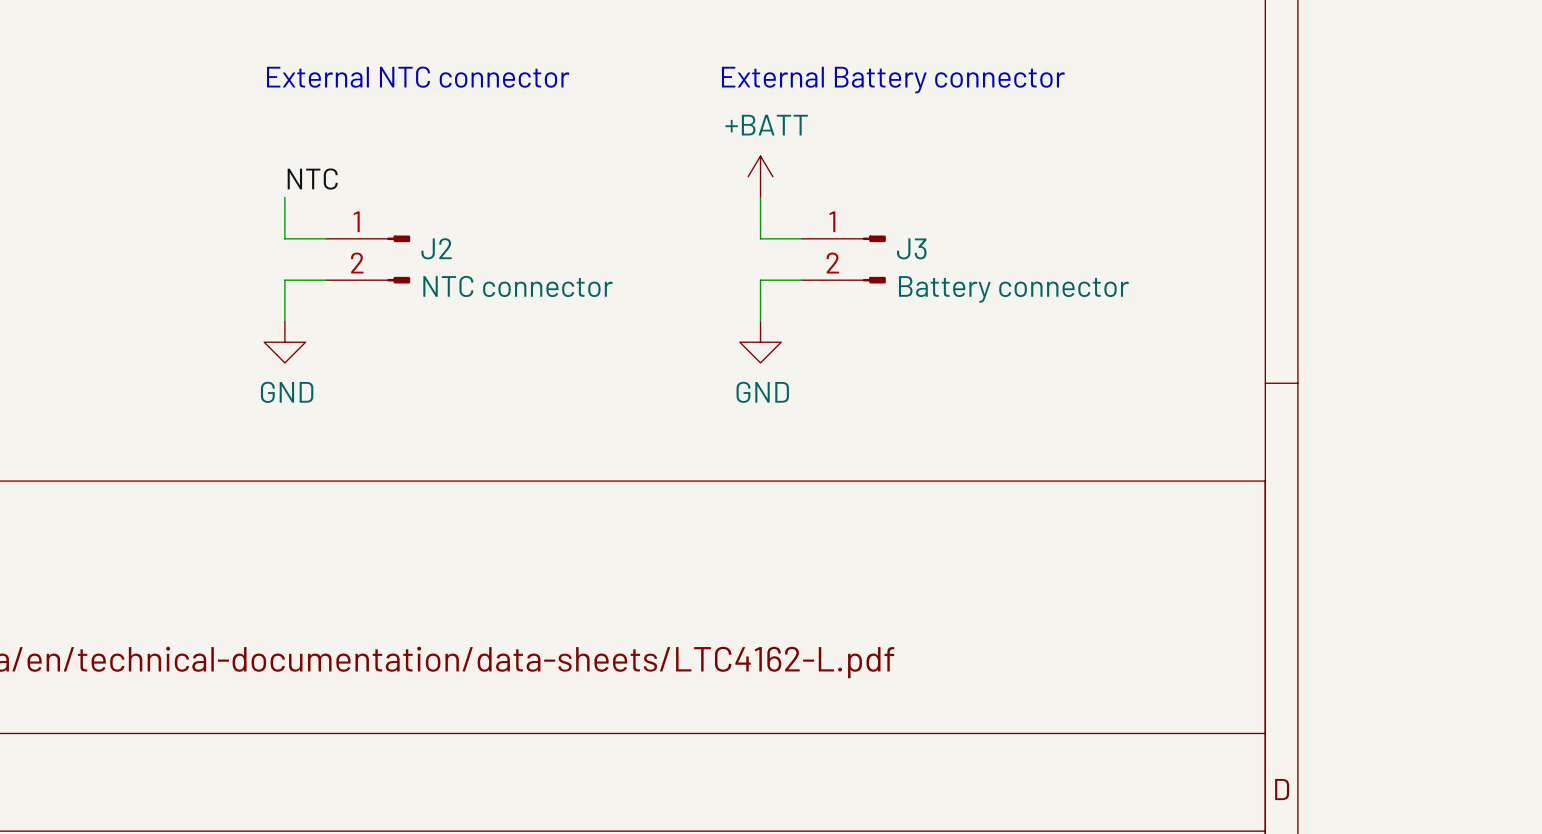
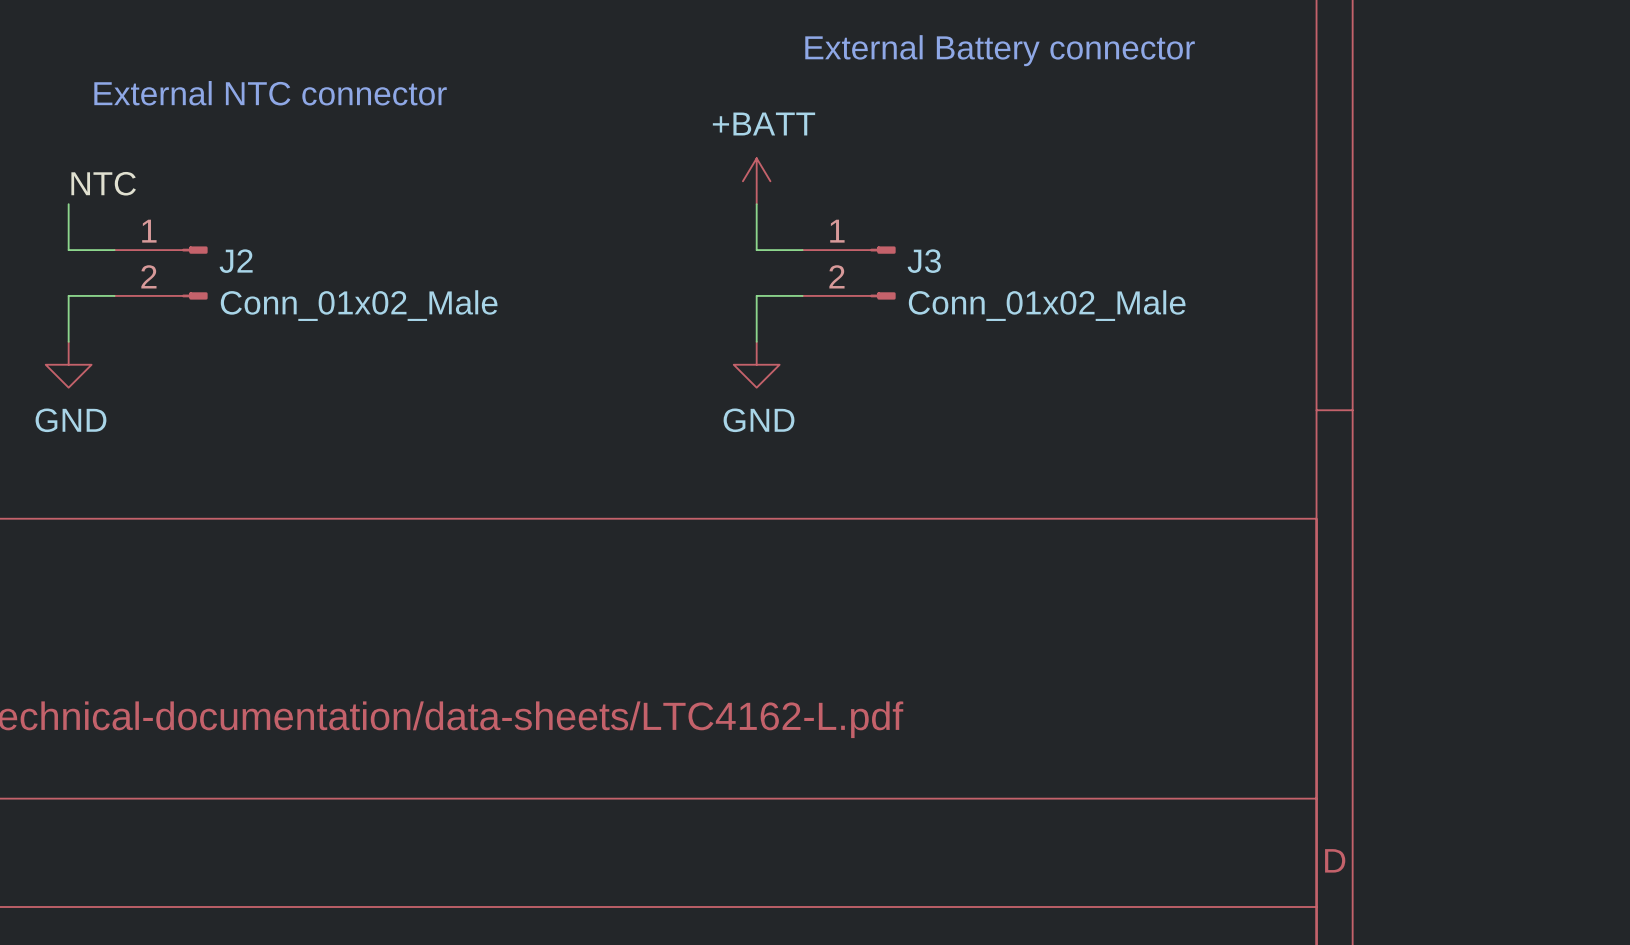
text position: External NTC connector (418, 77) -> External NTC connector (270, 93)
text position: External Battery connector (893, 80) -> External Battery connector (1000, 50)
label position: NTC (312, 179) -> NTC (103, 183)
wire: (284, 197) (284, 238) (326, 238) -> (68, 204) (68, 250) (114, 250)
J2 position: (368, 259) -> (161, 273)
wire: (326, 280) (284, 280) (284, 321) -> (114, 295) (68, 295) (68, 341)
J2 value: NTC connector (518, 286) -> Conn_01x02_Male (359, 305)
J3 value: Battery connector (1013, 289) -> Conn_01x02_Male (1047, 305)
power symbol position: GND (284, 342) -> GND (68, 364)

